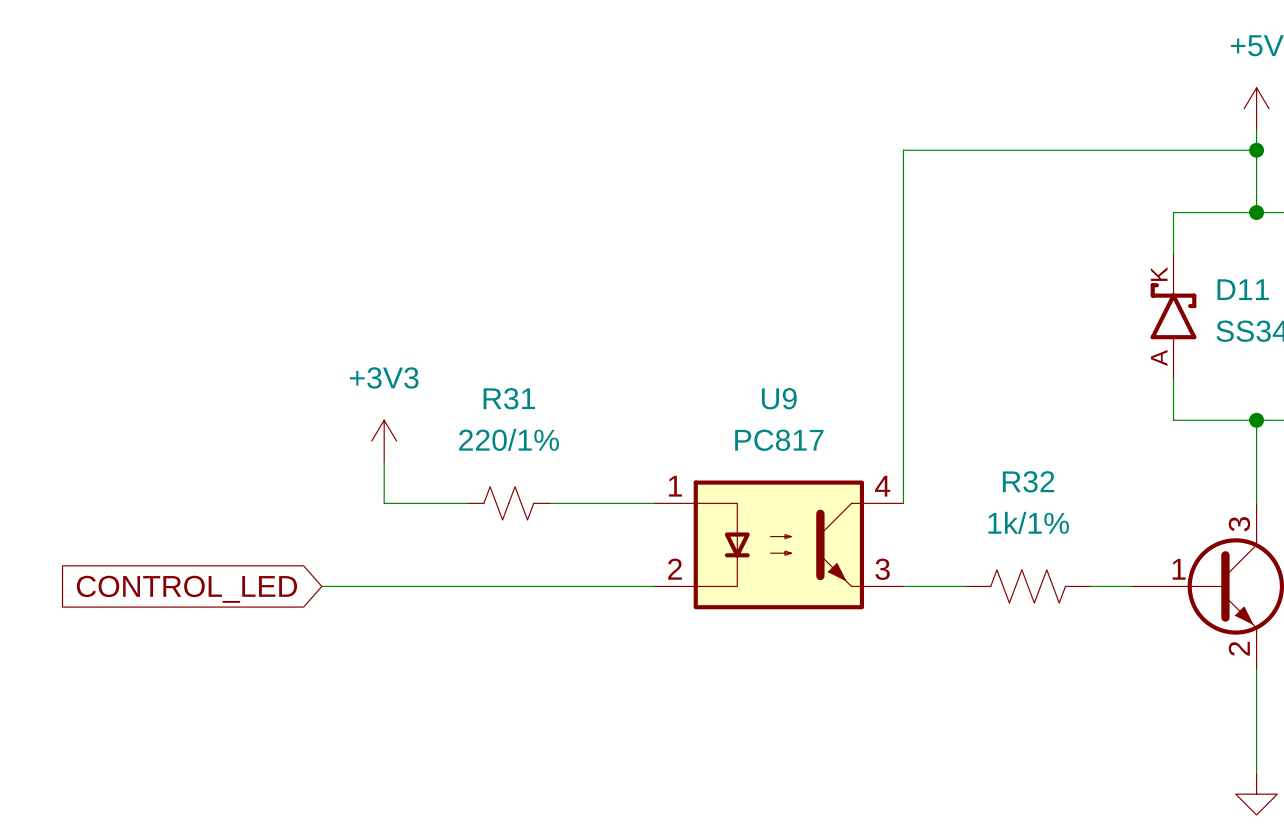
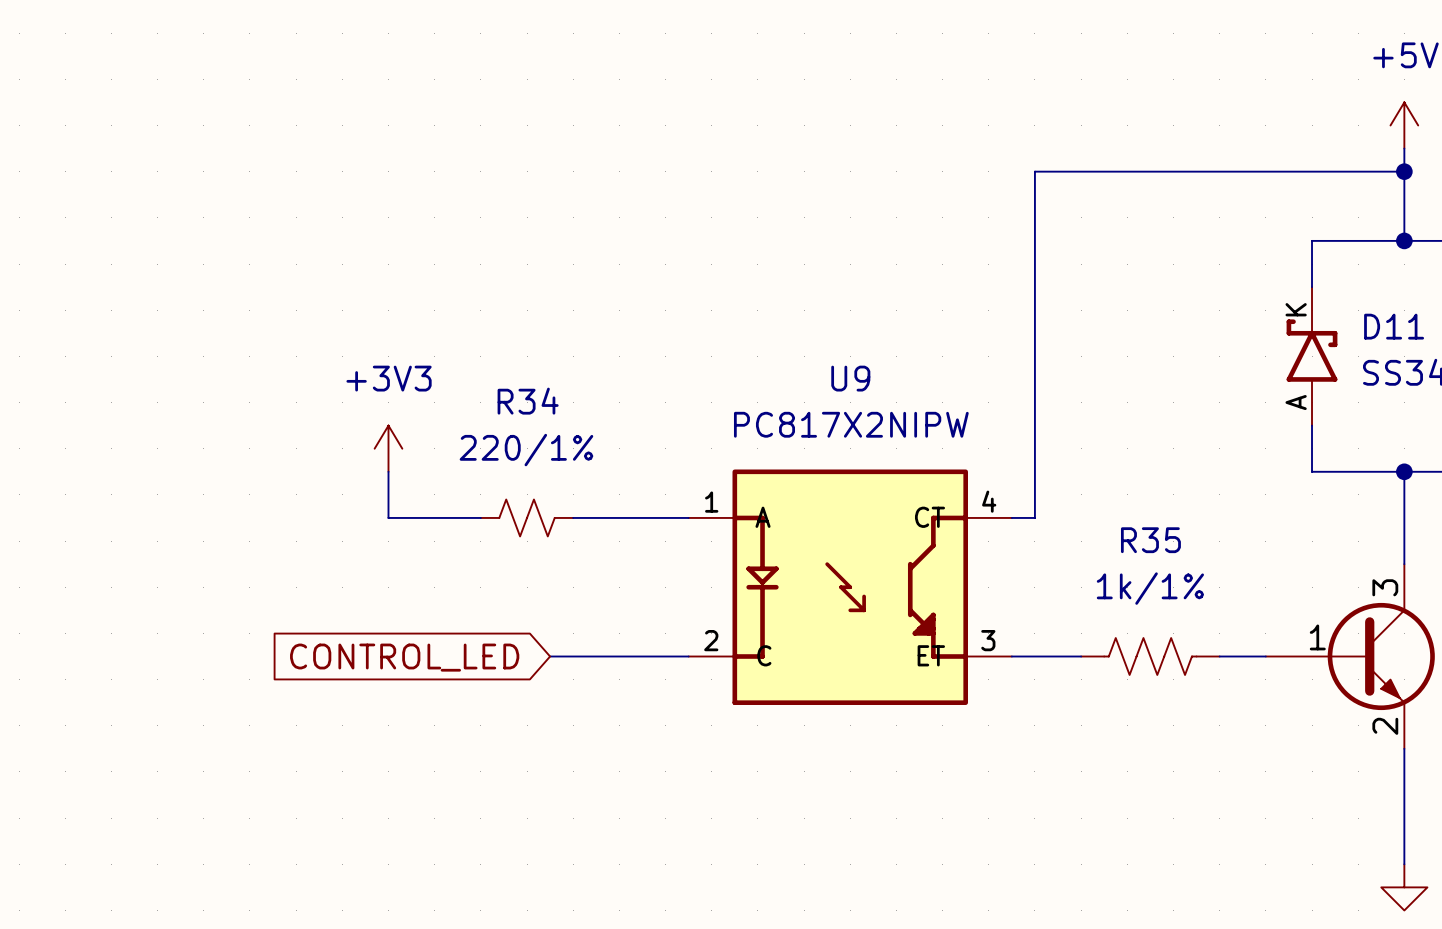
wire: (924, 150) (903, 150) (903, 503) -> (1034, 171) (1034, 517) (1011, 517)
U9 name position: U9 (779, 398) -> U9 (850, 378)
U9 value: PC817 (779, 440) -> PC817X2NIPW (851, 424)
power symbol position: +3V3 (384, 441) -> +3V3 (388, 448)
wire: (384, 461) (384, 503) (467, 503) -> (388, 471) (388, 517) (480, 517)
R34: none -> 220/1% (527, 517)
U9 symbol: [654, 480, 904, 610] -> [688, 469, 1012, 705]
R32 name: R32 (1028, 481) -> R35 (1150, 540)
R31: 220/1% (508, 503) -> none
wire: (550, 503) (654, 503) -> (573, 517) (688, 517)
wire: (321, 586) (488, 586) -> none
global label position: CONTROL_LED (186, 589) -> CONTROL_LED (404, 657)

